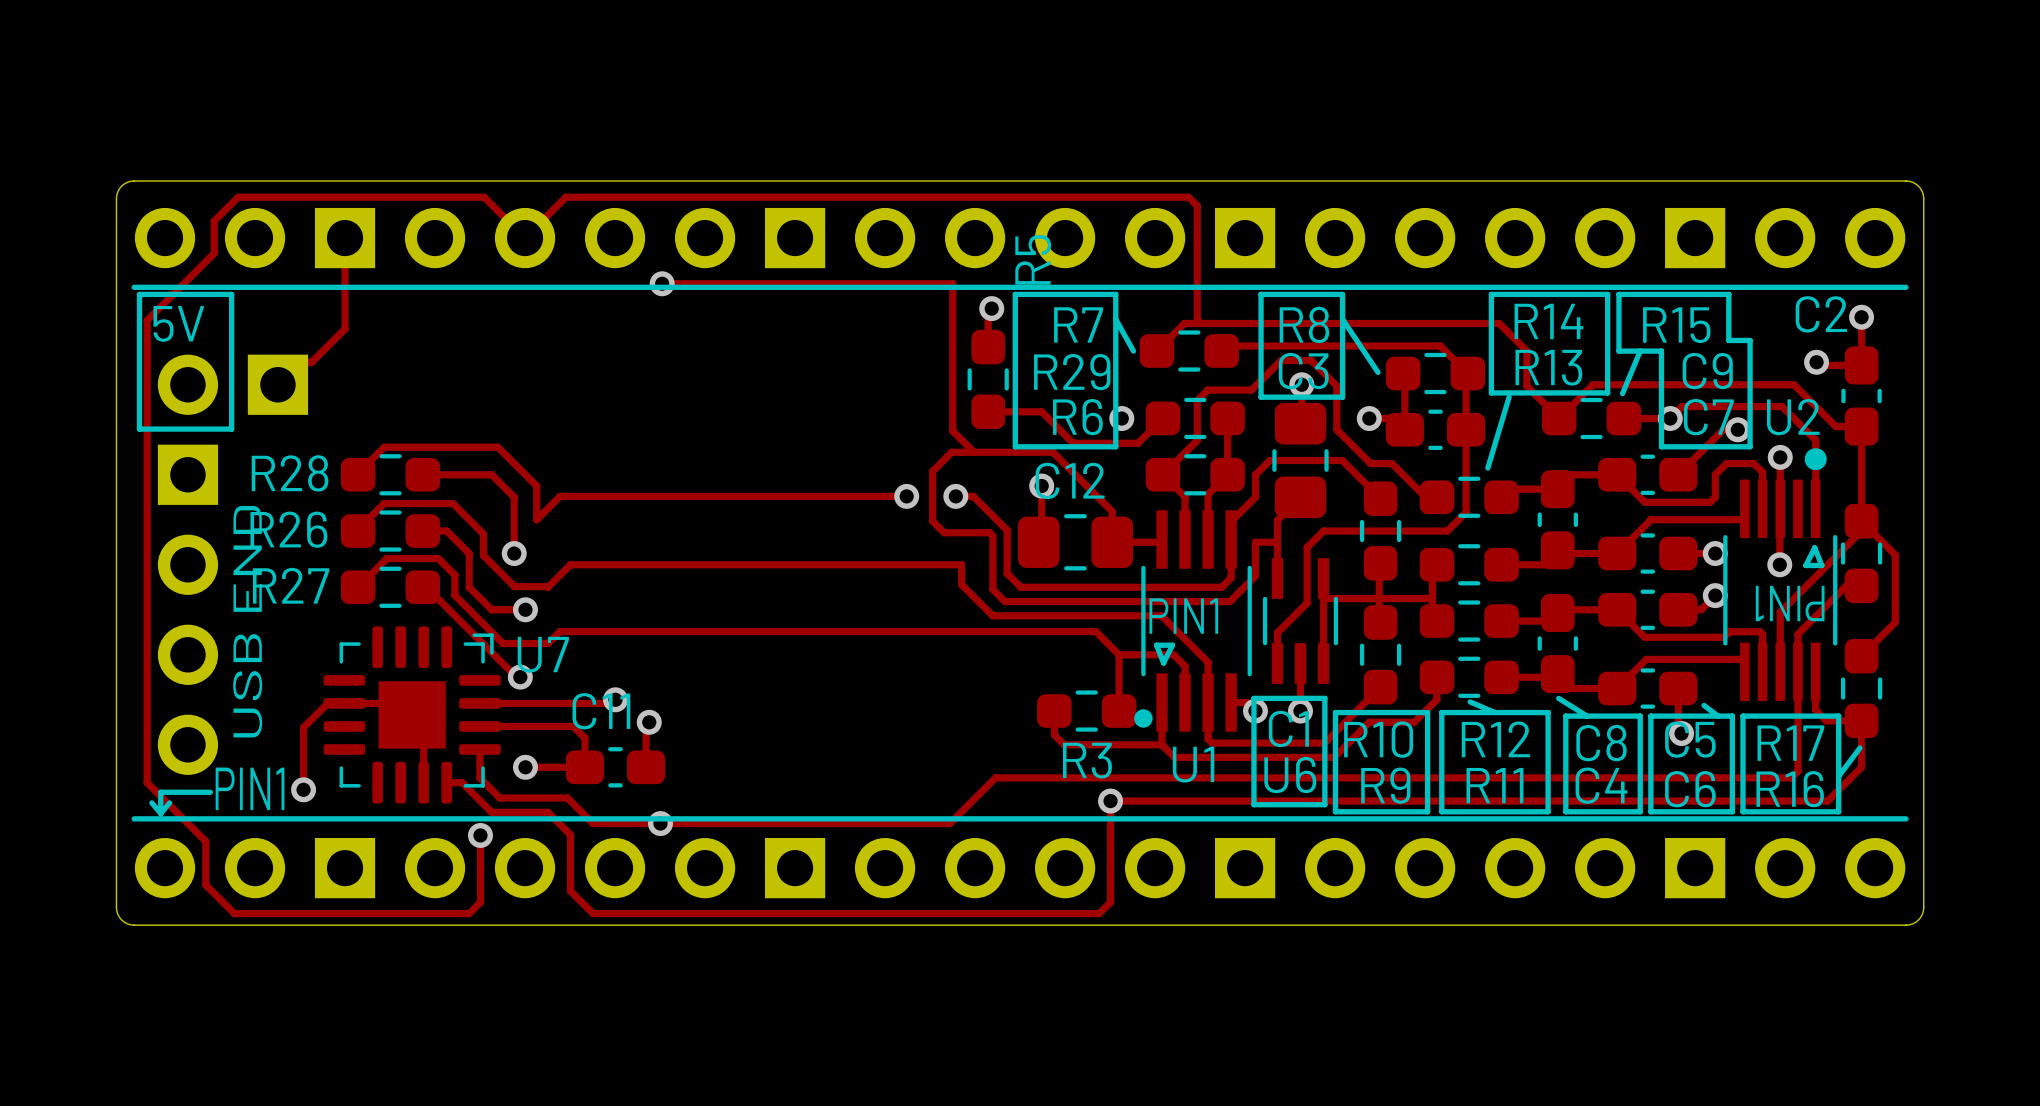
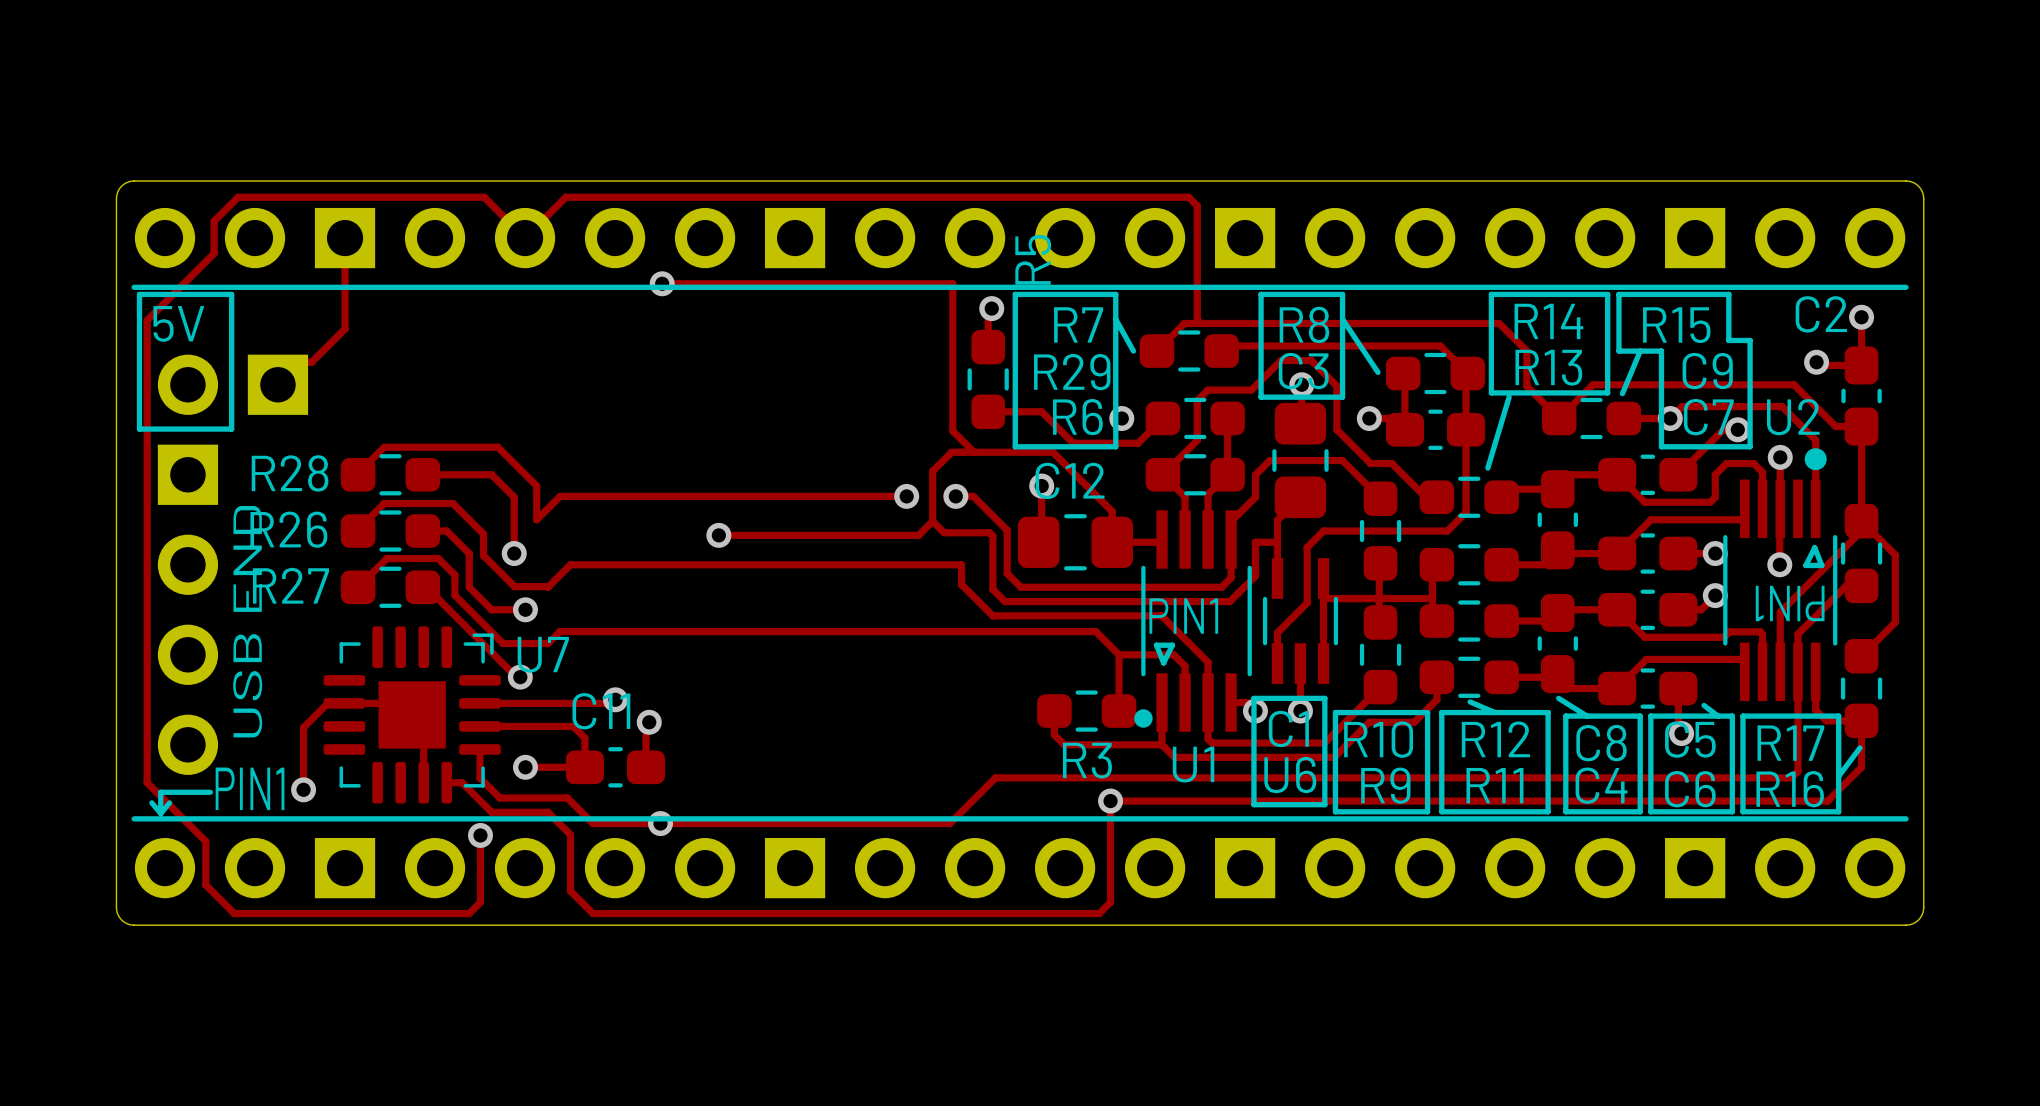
track: none -> (932, 521) (918, 535) (718, 535)
via: none -> (718, 535)

